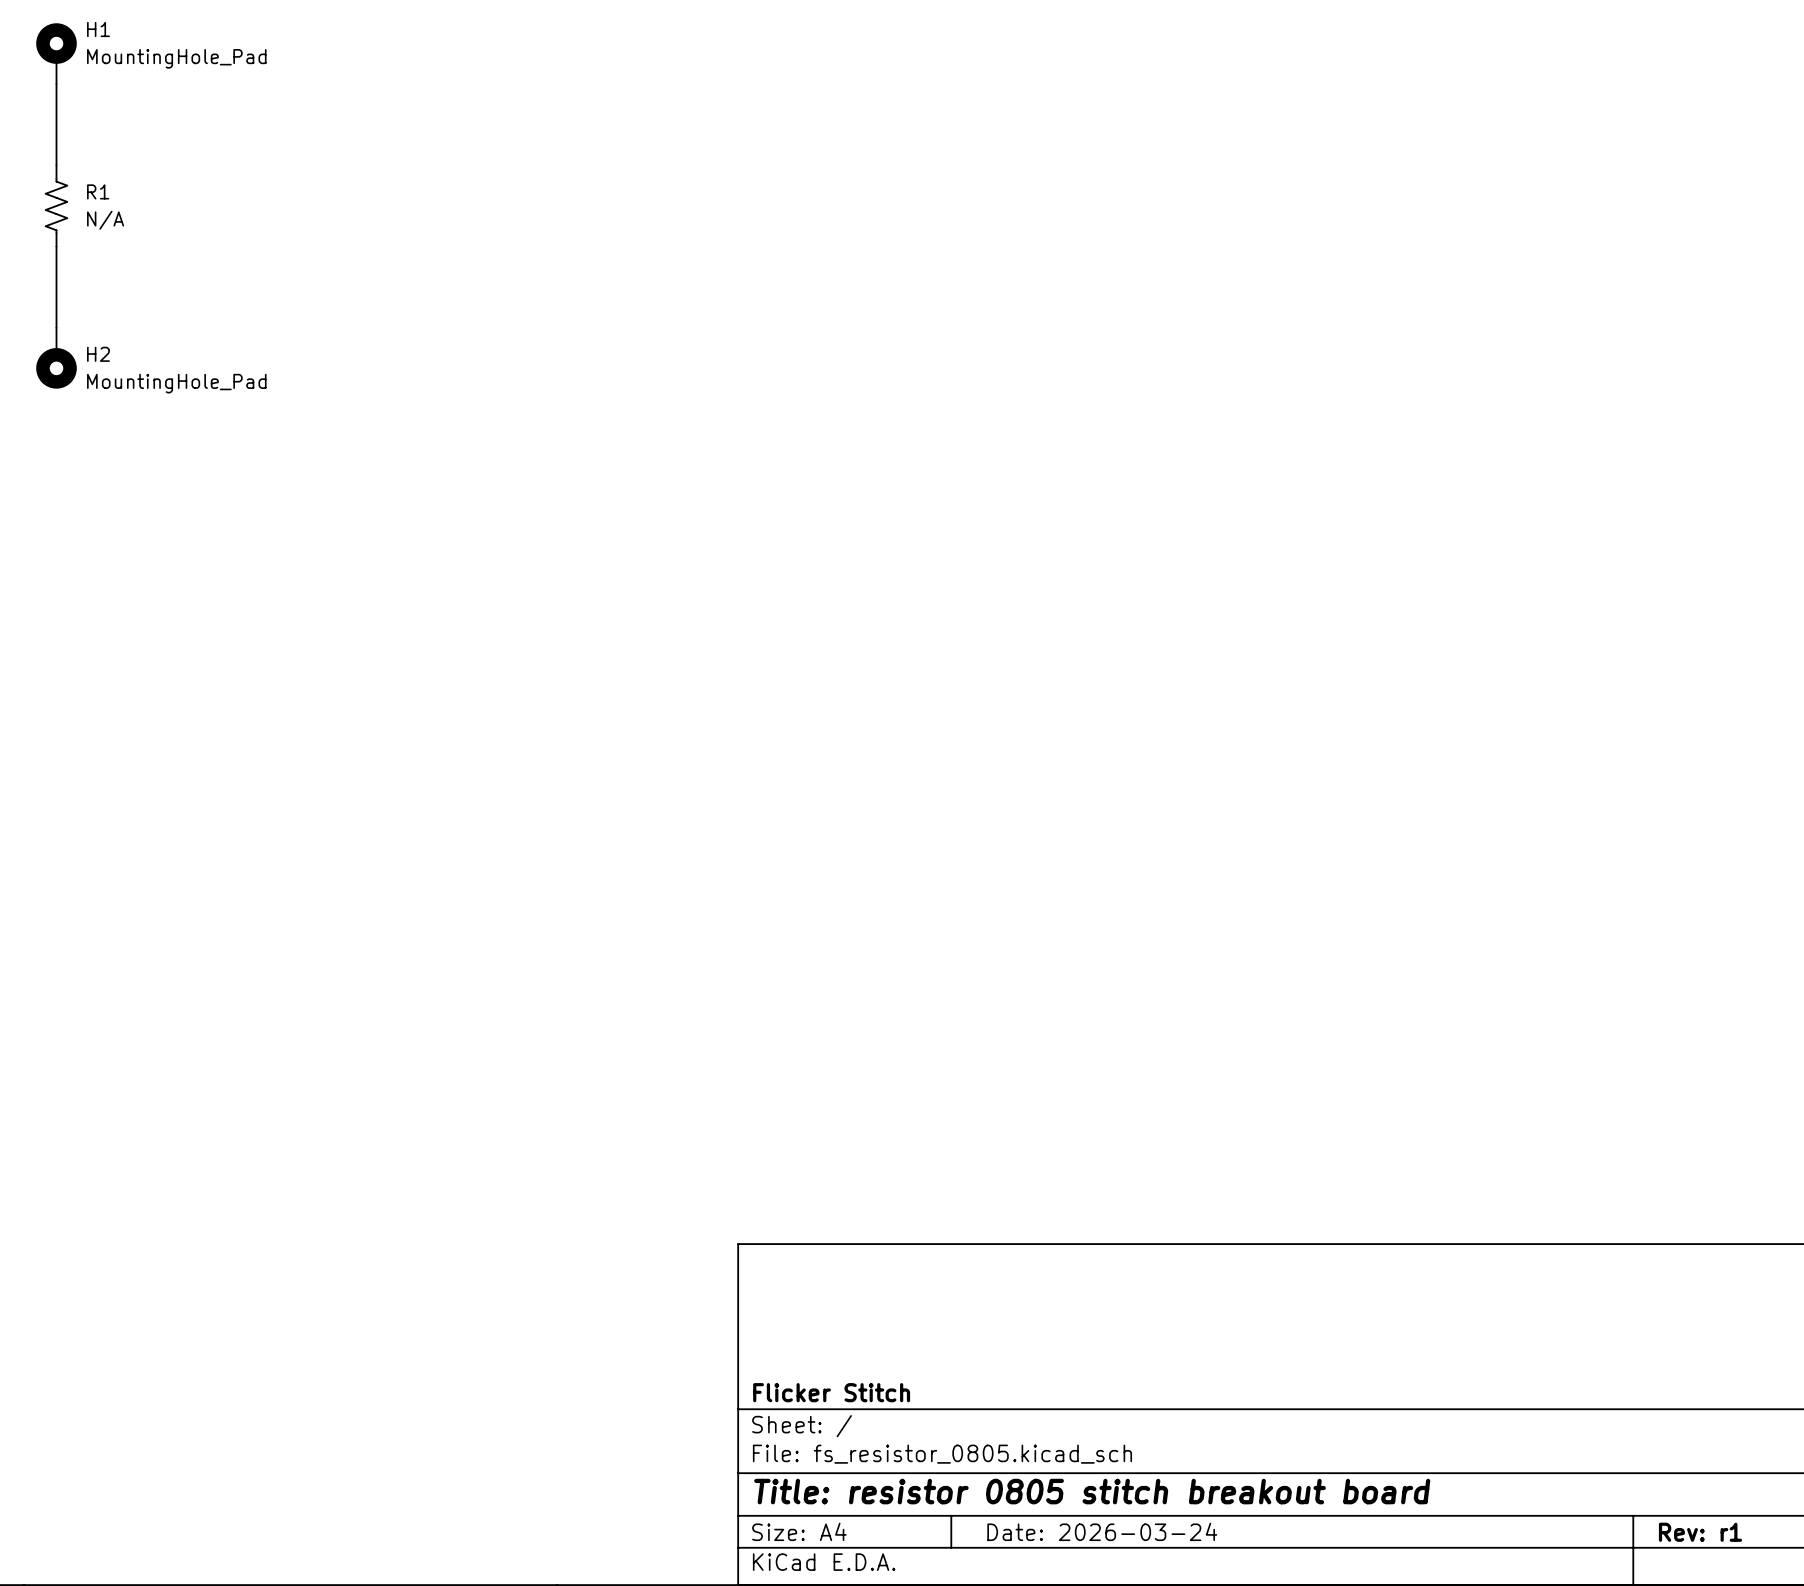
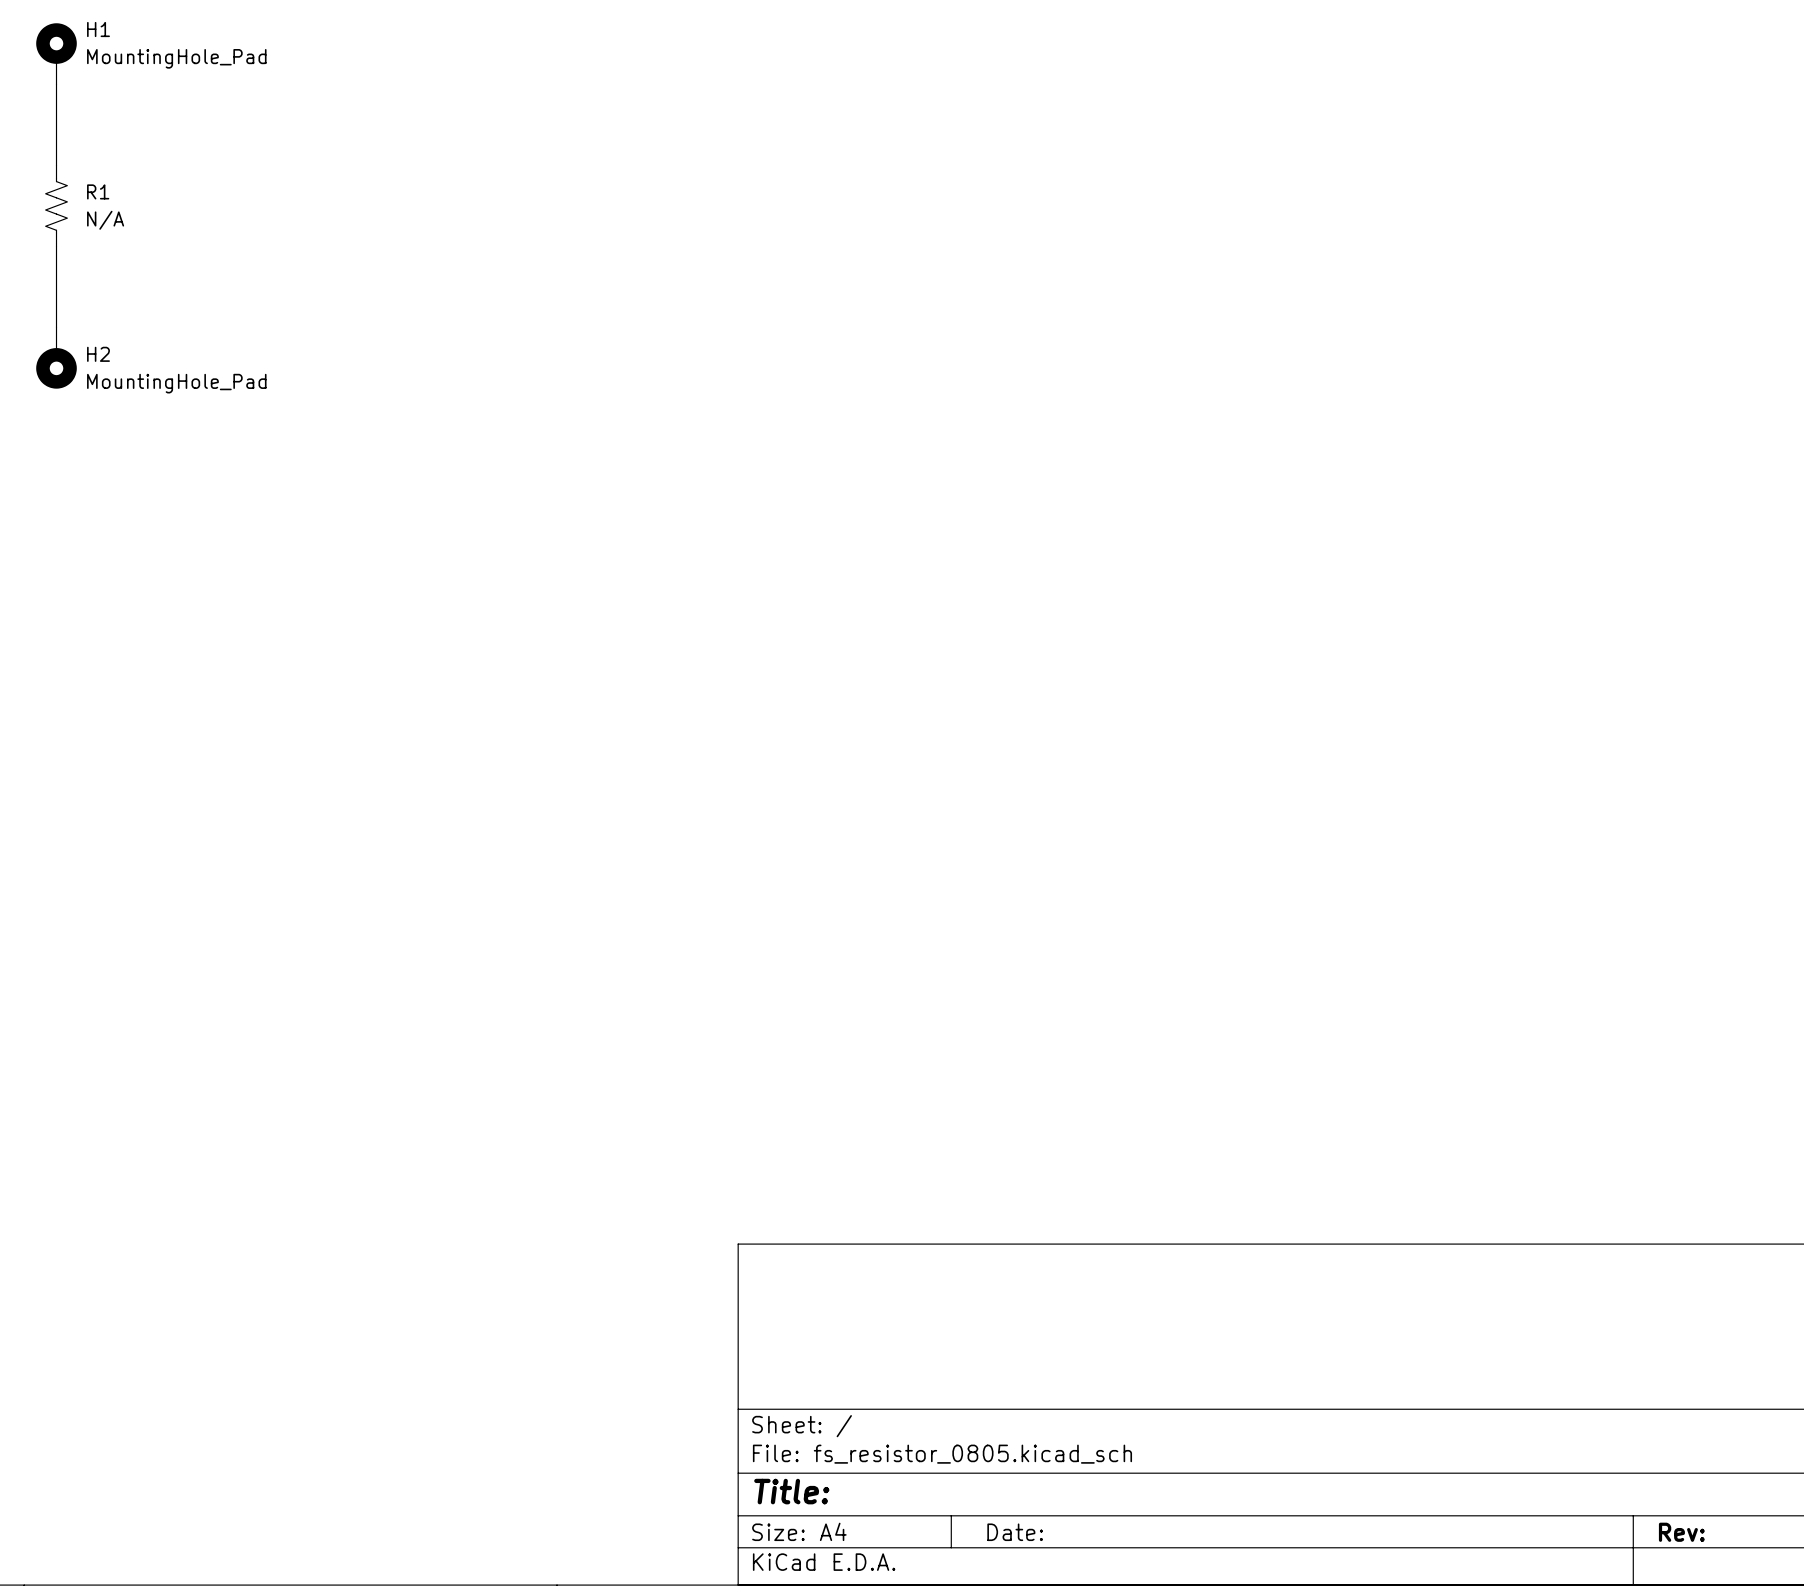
title block: Flicker Stitch (831, 1392) -> none
title block: Title: resistor 0805 stitch breakout board (1092, 1491) -> Title: (791, 1491)
title block: Date: 2026-03-24 (1102, 1531) -> Date: (1015, 1532)
title block: Rev: r1 (1700, 1532) -> Rev: (1681, 1532)

